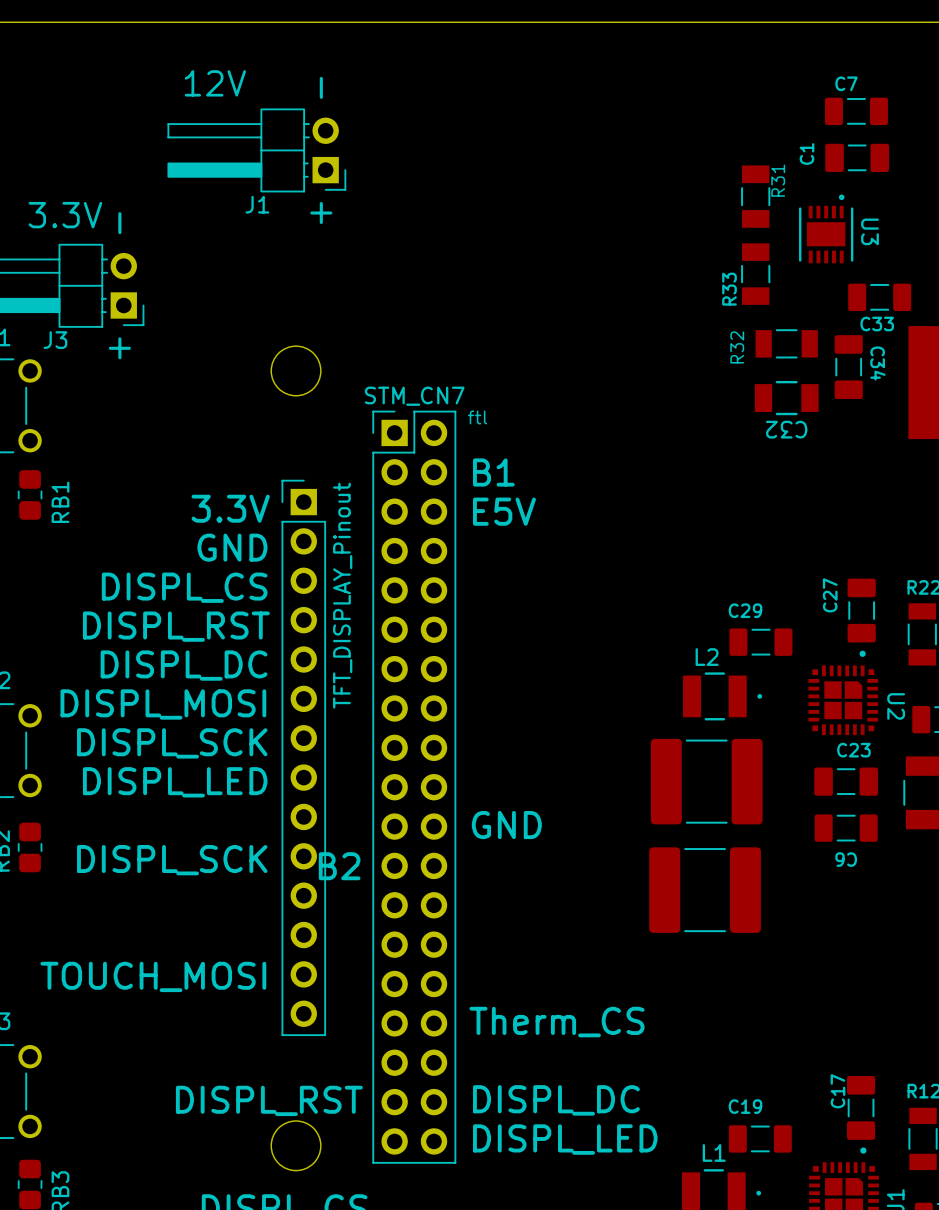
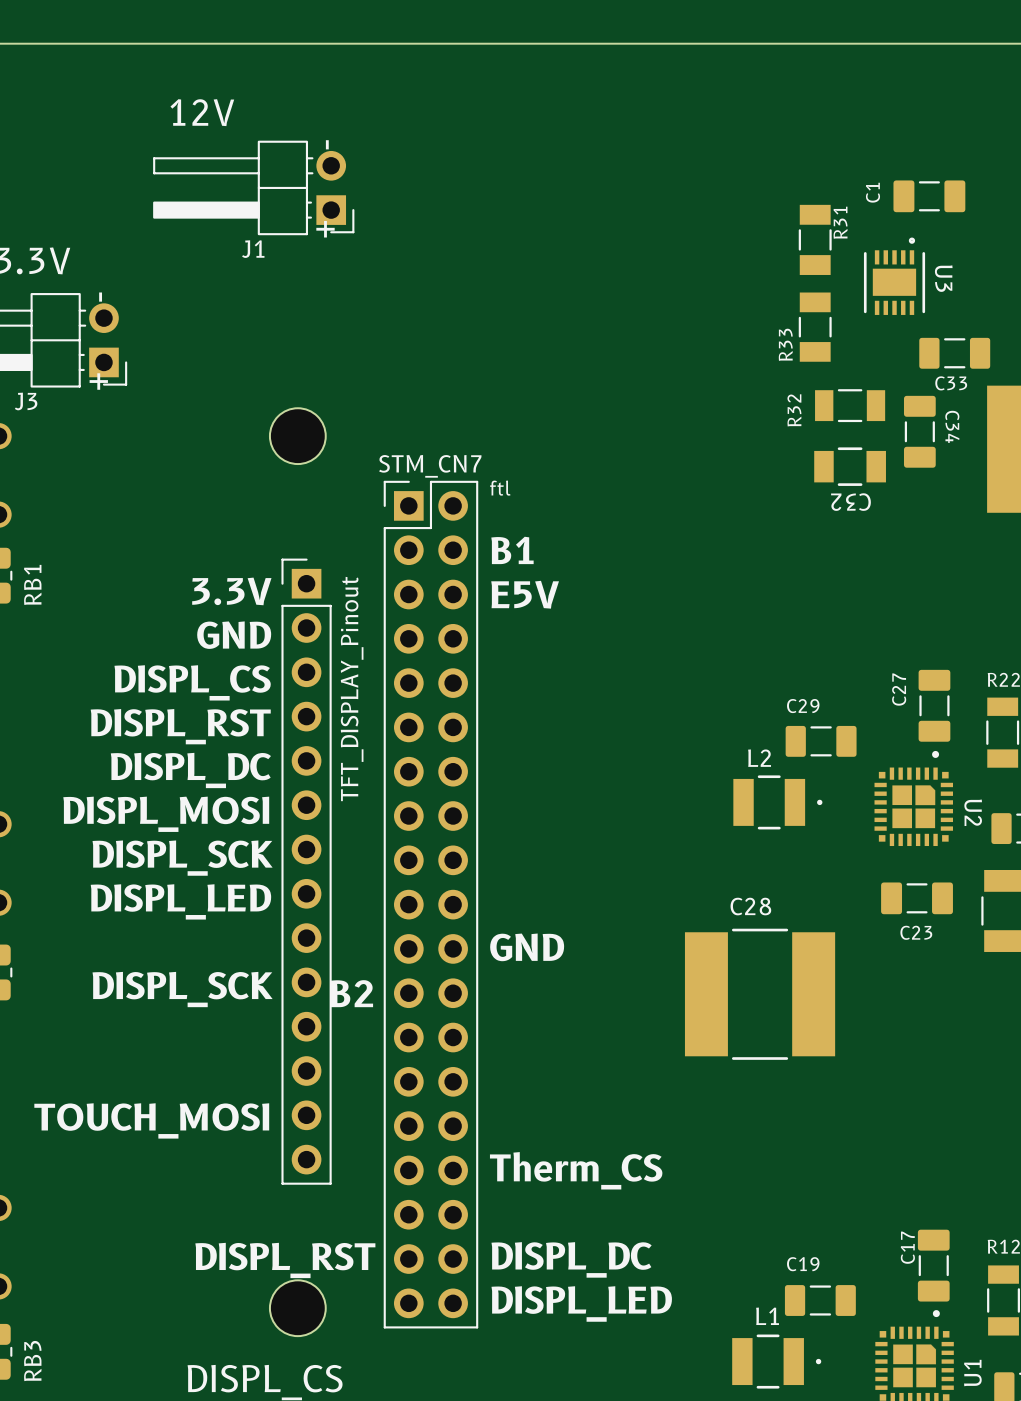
C7: (856, 111) -> none
C23 name position: C23 (853, 750) -> C23 (916, 932)
part: (706, 781) -> none
C6: (846, 828) -> none
C28: none -> (760, 994)
part: (705, 890) -> none

